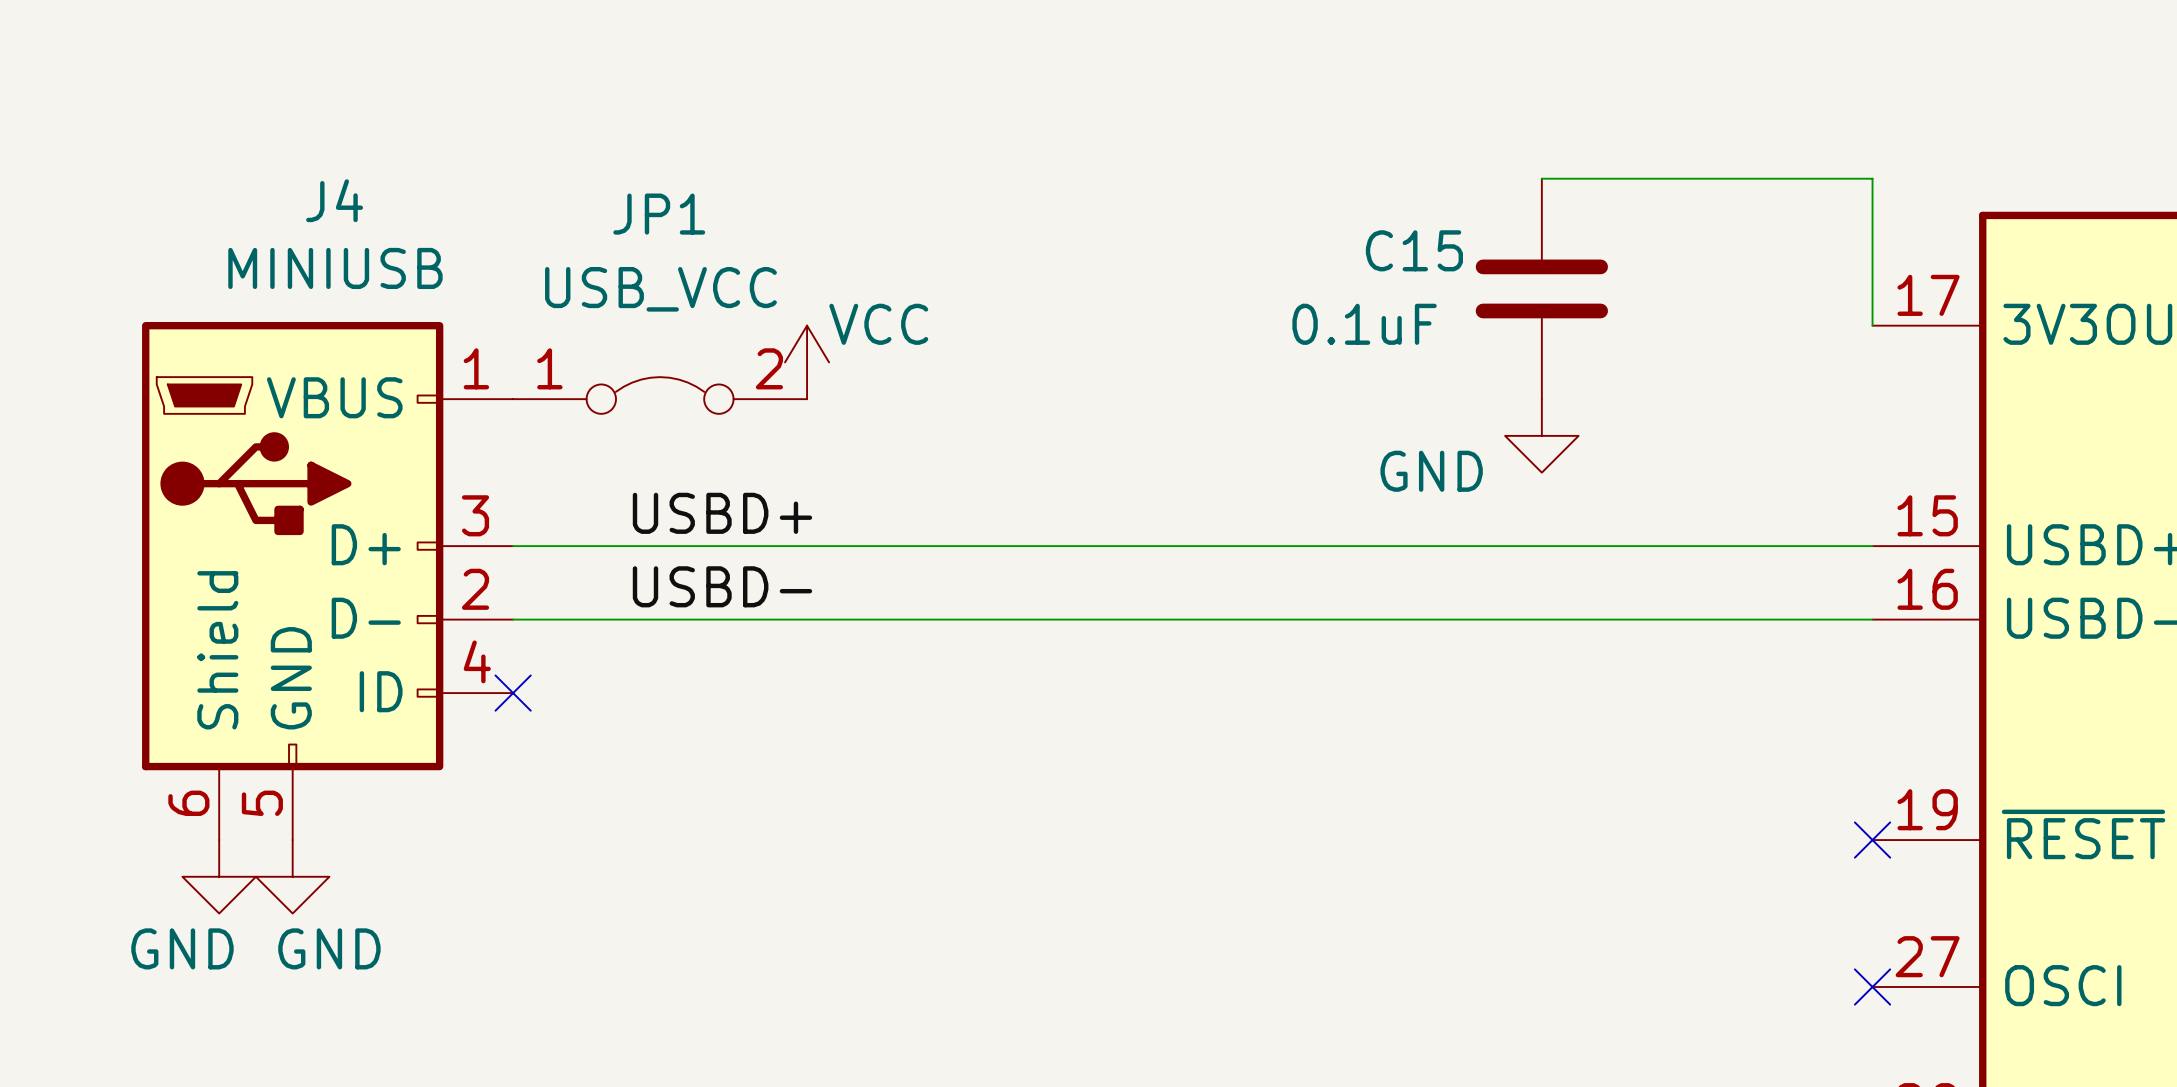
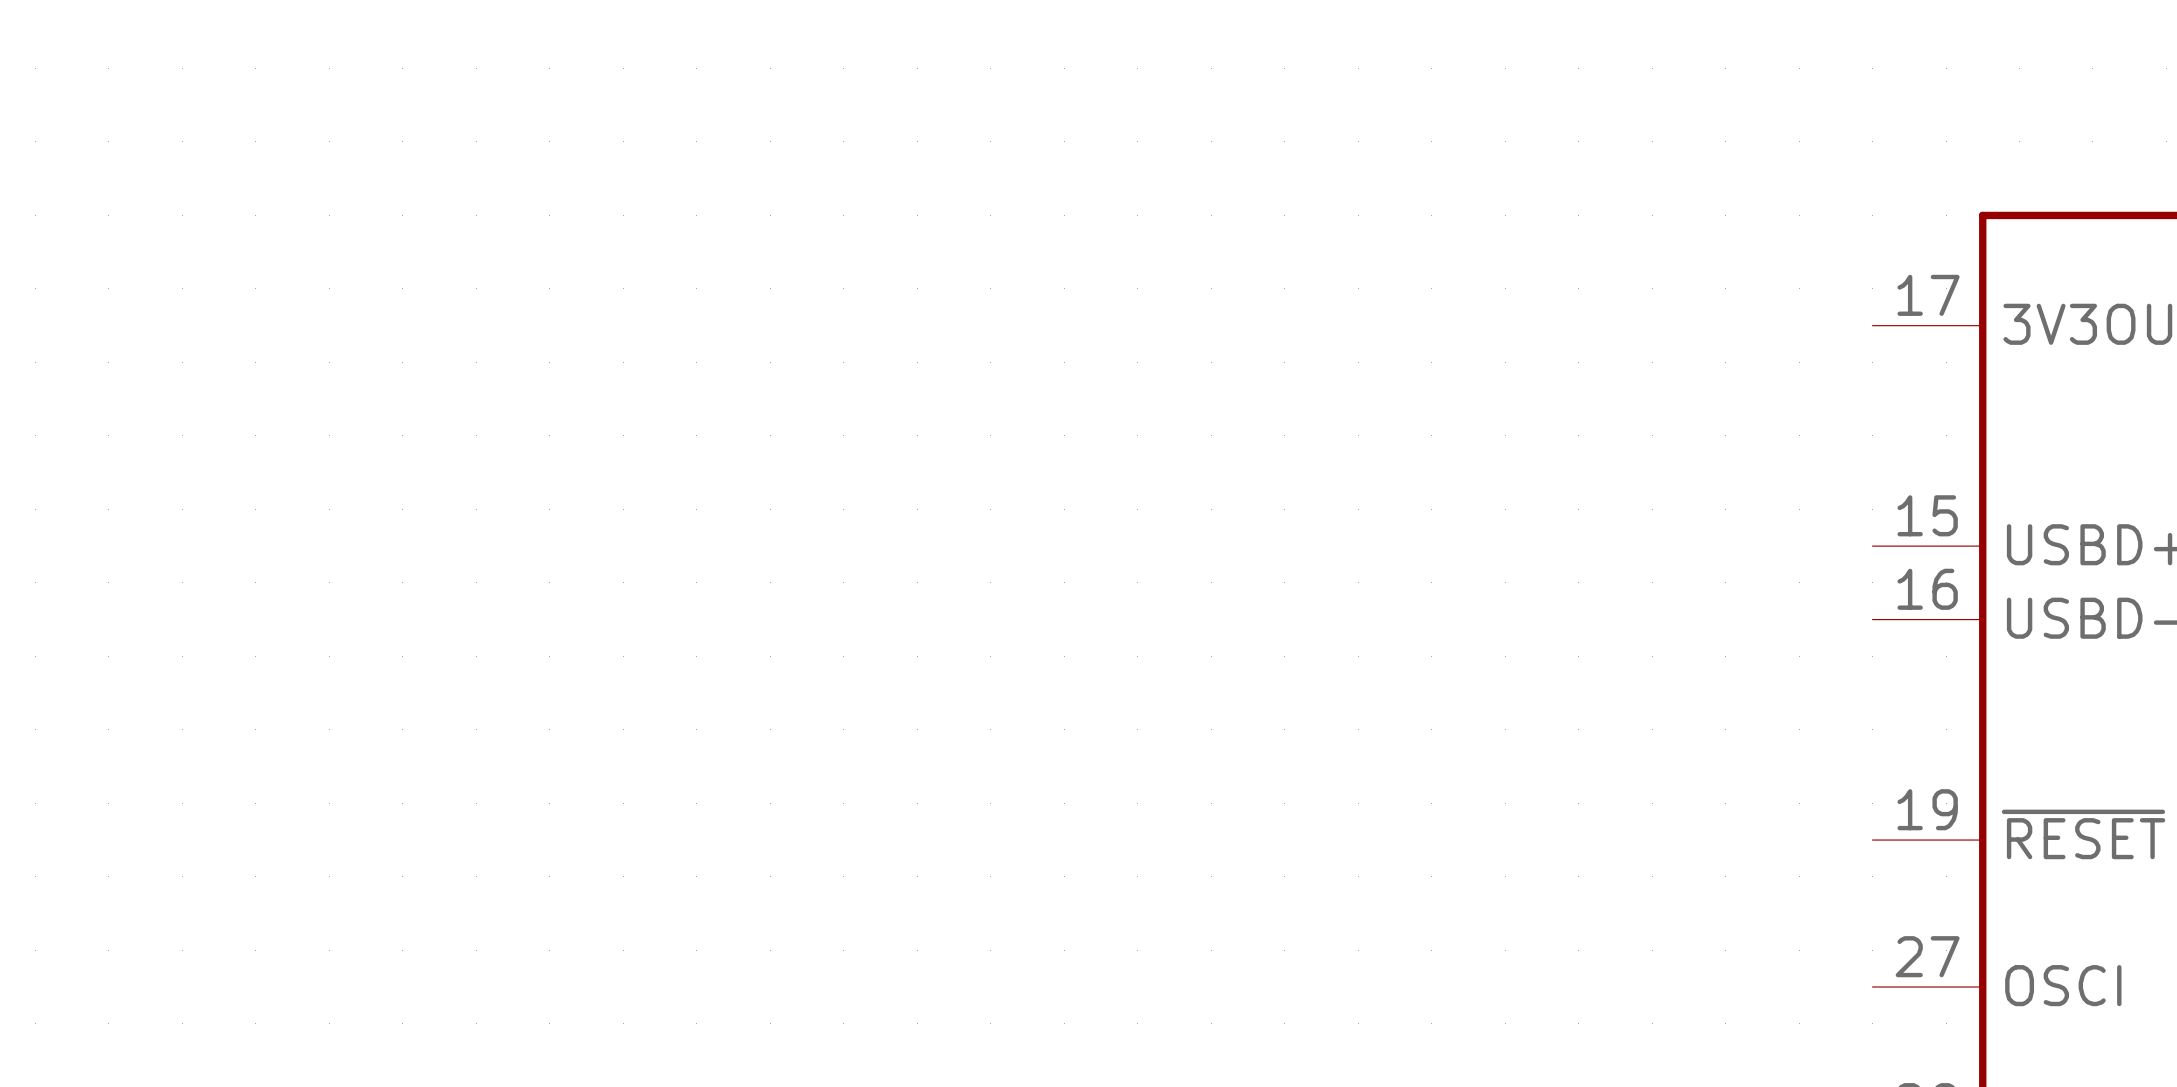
wire: (1541, 178) (1872, 178) (1872, 325) -> none
C15: 0.1uF (1541, 288) -> none
power symbol: VCC (807, 362) -> none
JP1: USB_VCC (660, 395) -> none
power symbol: GND (1541, 435) -> none
label: USBD+ (722, 513) -> none
wire: (513, 546) (1872, 546) -> none
J4: MINIUSB (327, 581) -> none
label: USBD- (722, 586) -> none
wire: (513, 619) (1872, 619) -> none
no-connect mark: (513, 693) -> none
no-connect mark: (1872, 840) -> none
power symbol: GND (219, 876) -> none
power symbol: GND (292, 876) -> none
no-connect mark: (1872, 987) -> none

